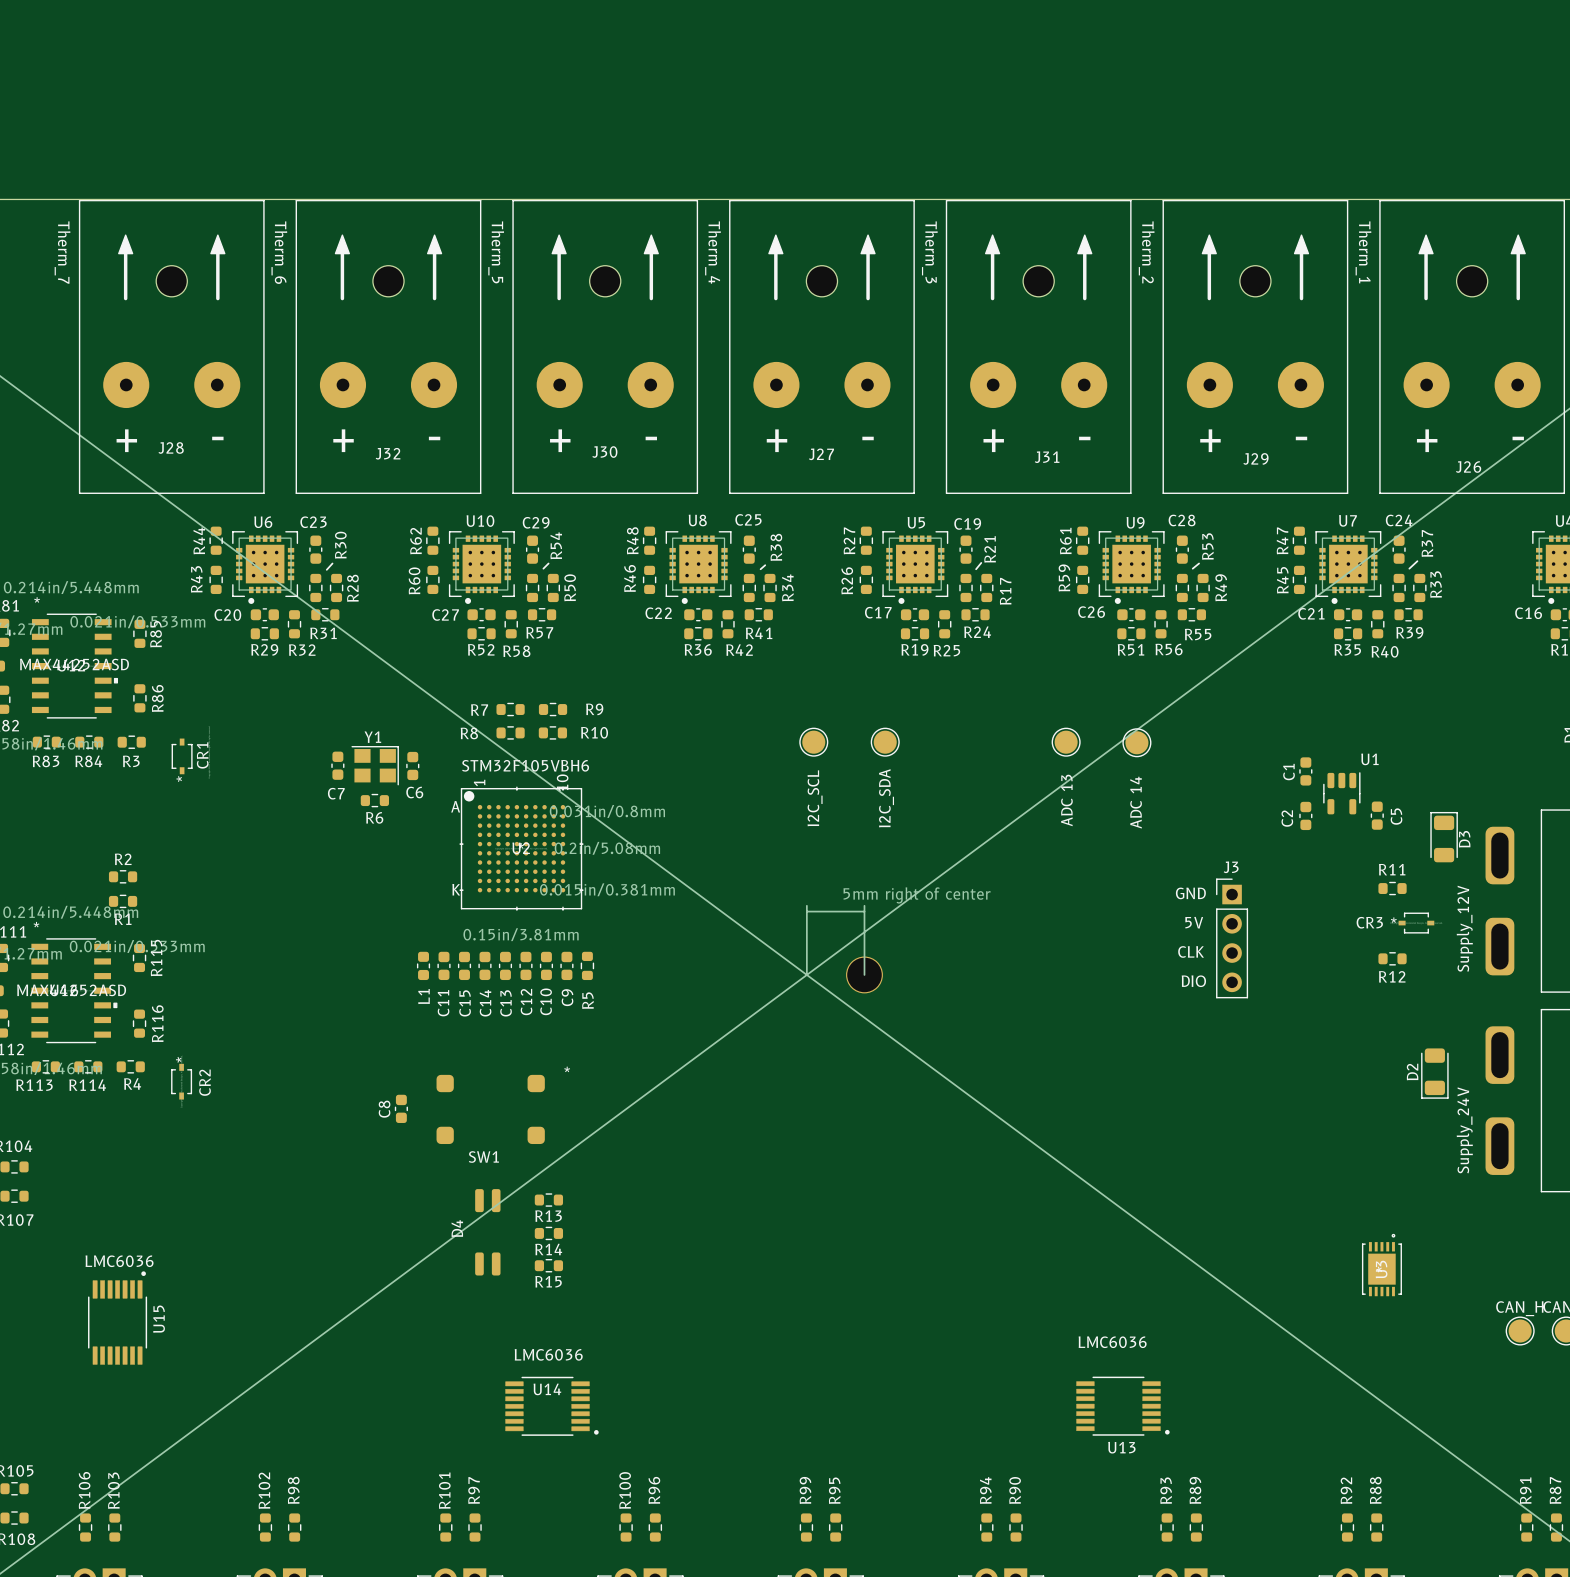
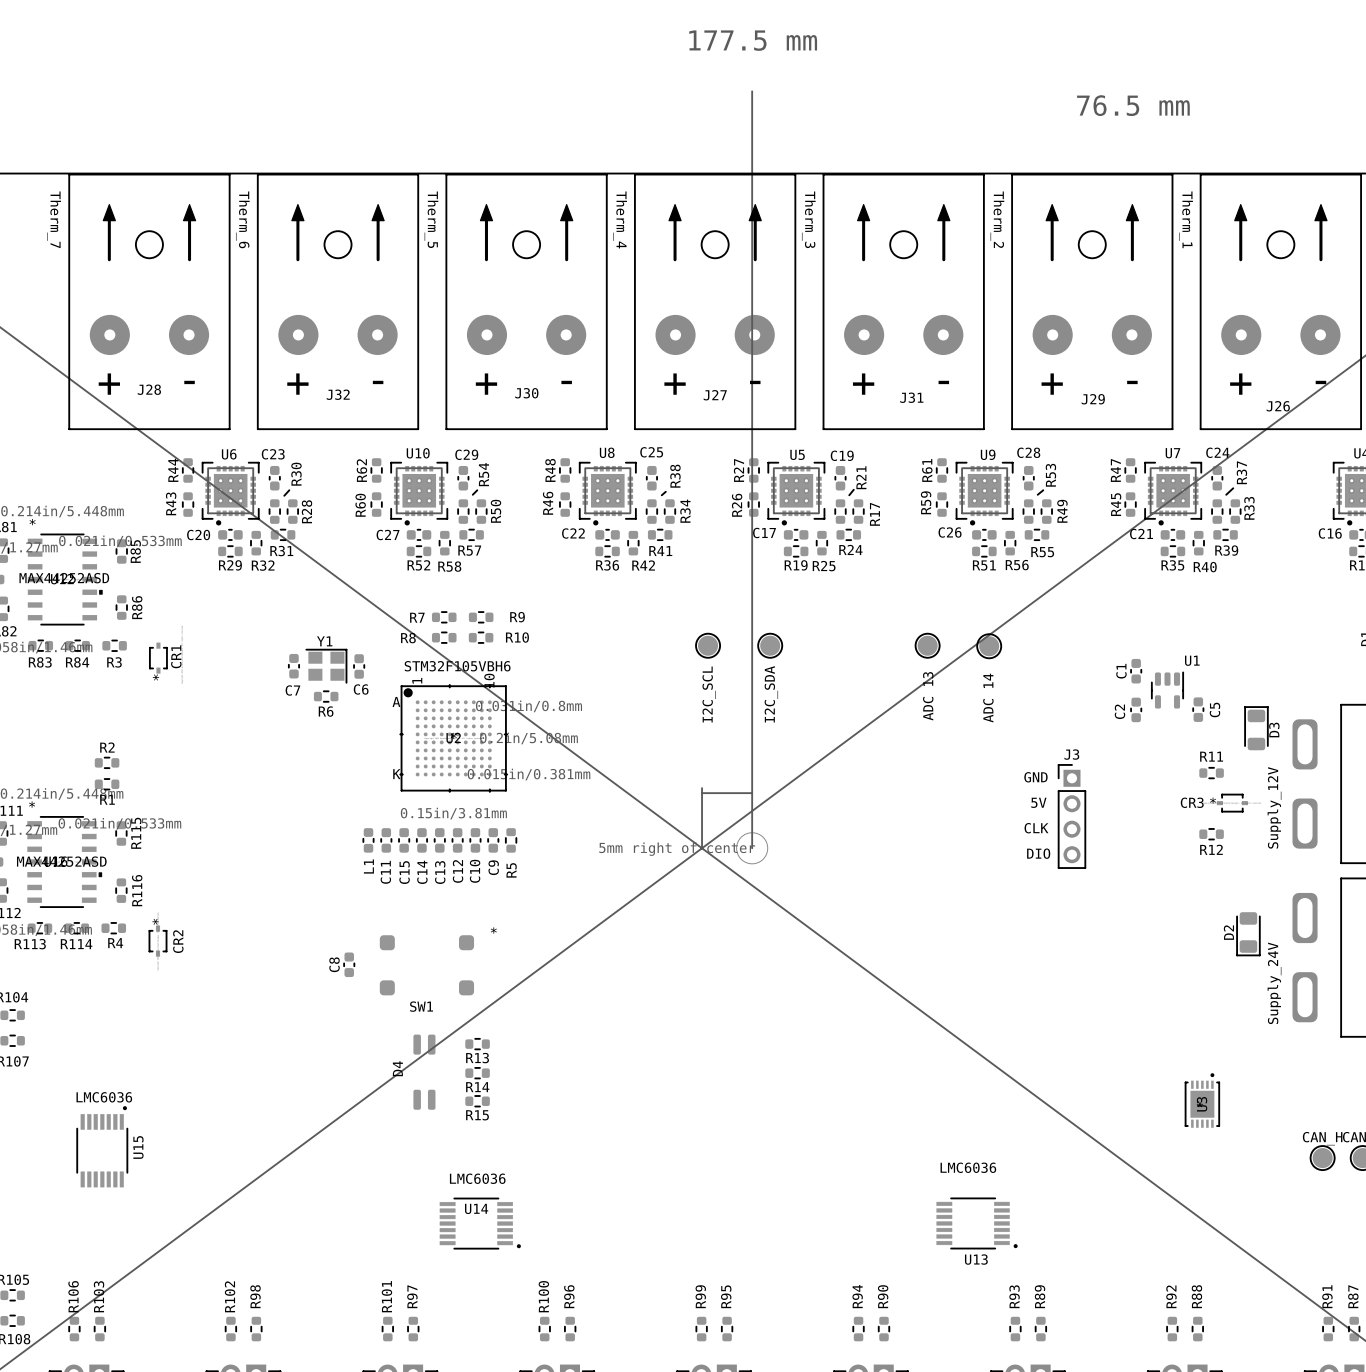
text: none -> 177.5 mm (753, 40)
line: none -> (752, 91) (752, 788)
text: none -> 76.5 mm (1133, 105)
text position: 5mm right of center (917, 895) -> 5mm right of center (677, 849)

